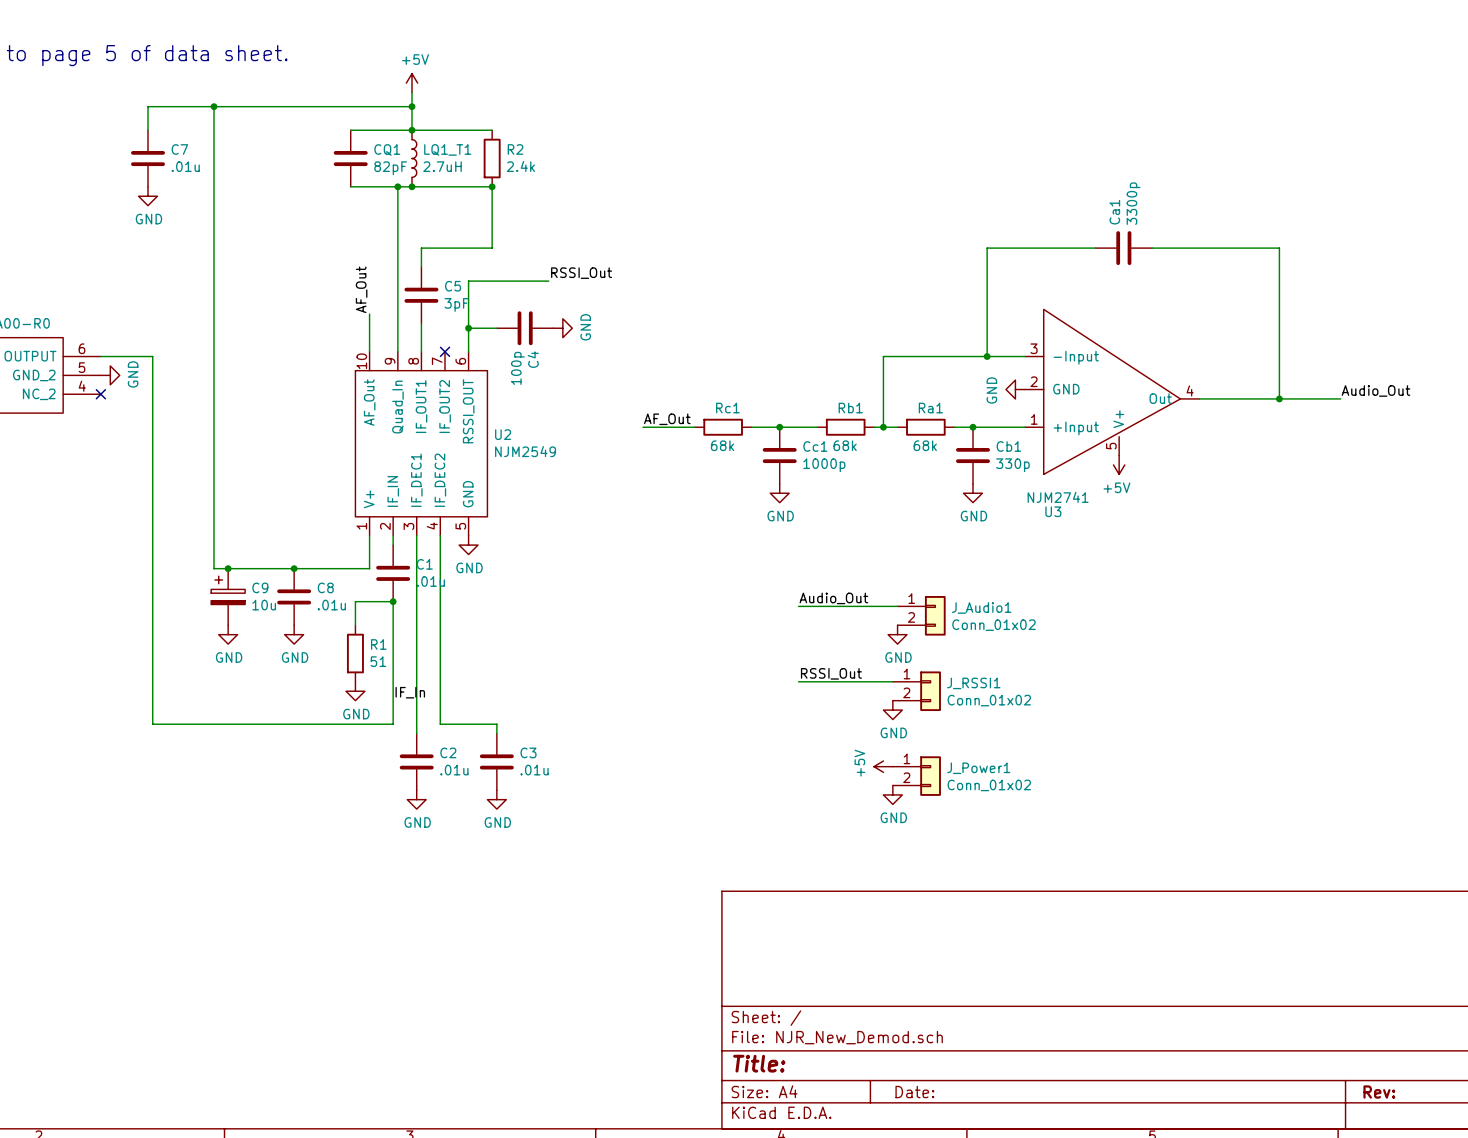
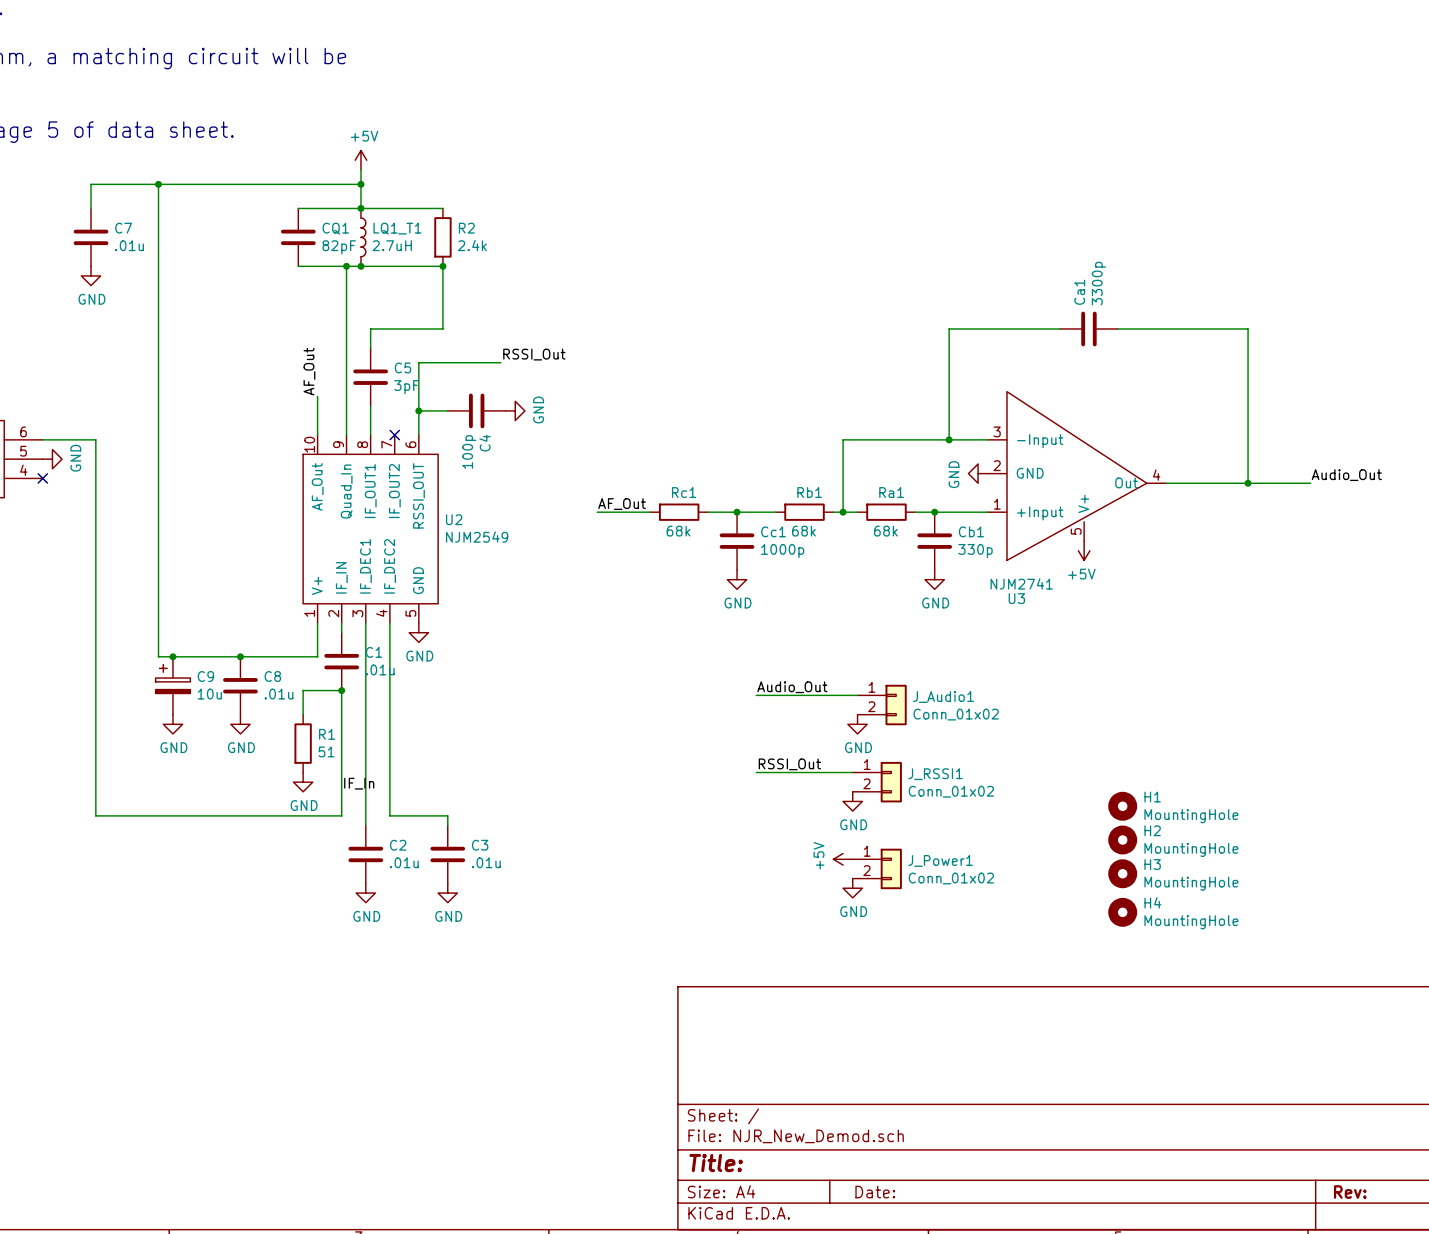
H1: none -> MountingHole (1122, 806)
H2: none -> MountingHole (1122, 840)
H3: none -> MountingHole (1122, 873)
H4: none -> MountingHole (1122, 912)

